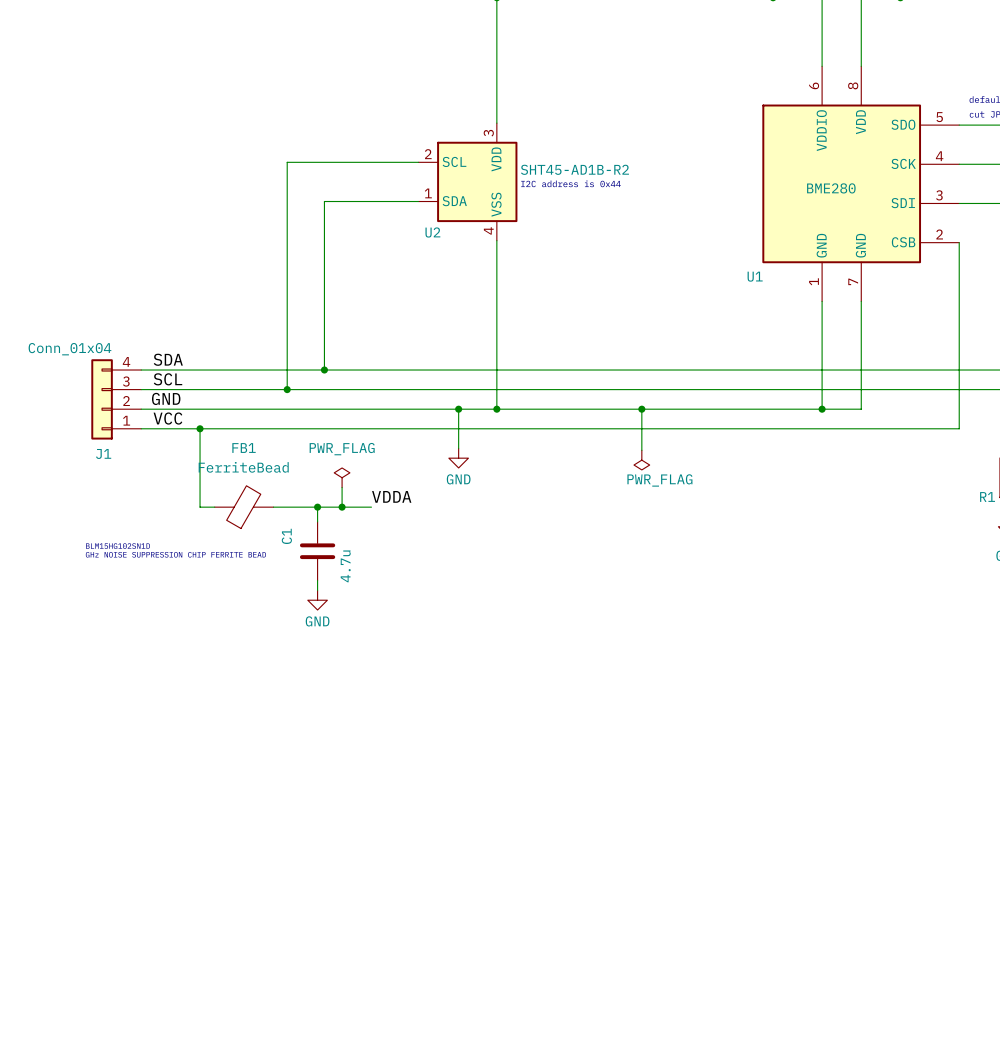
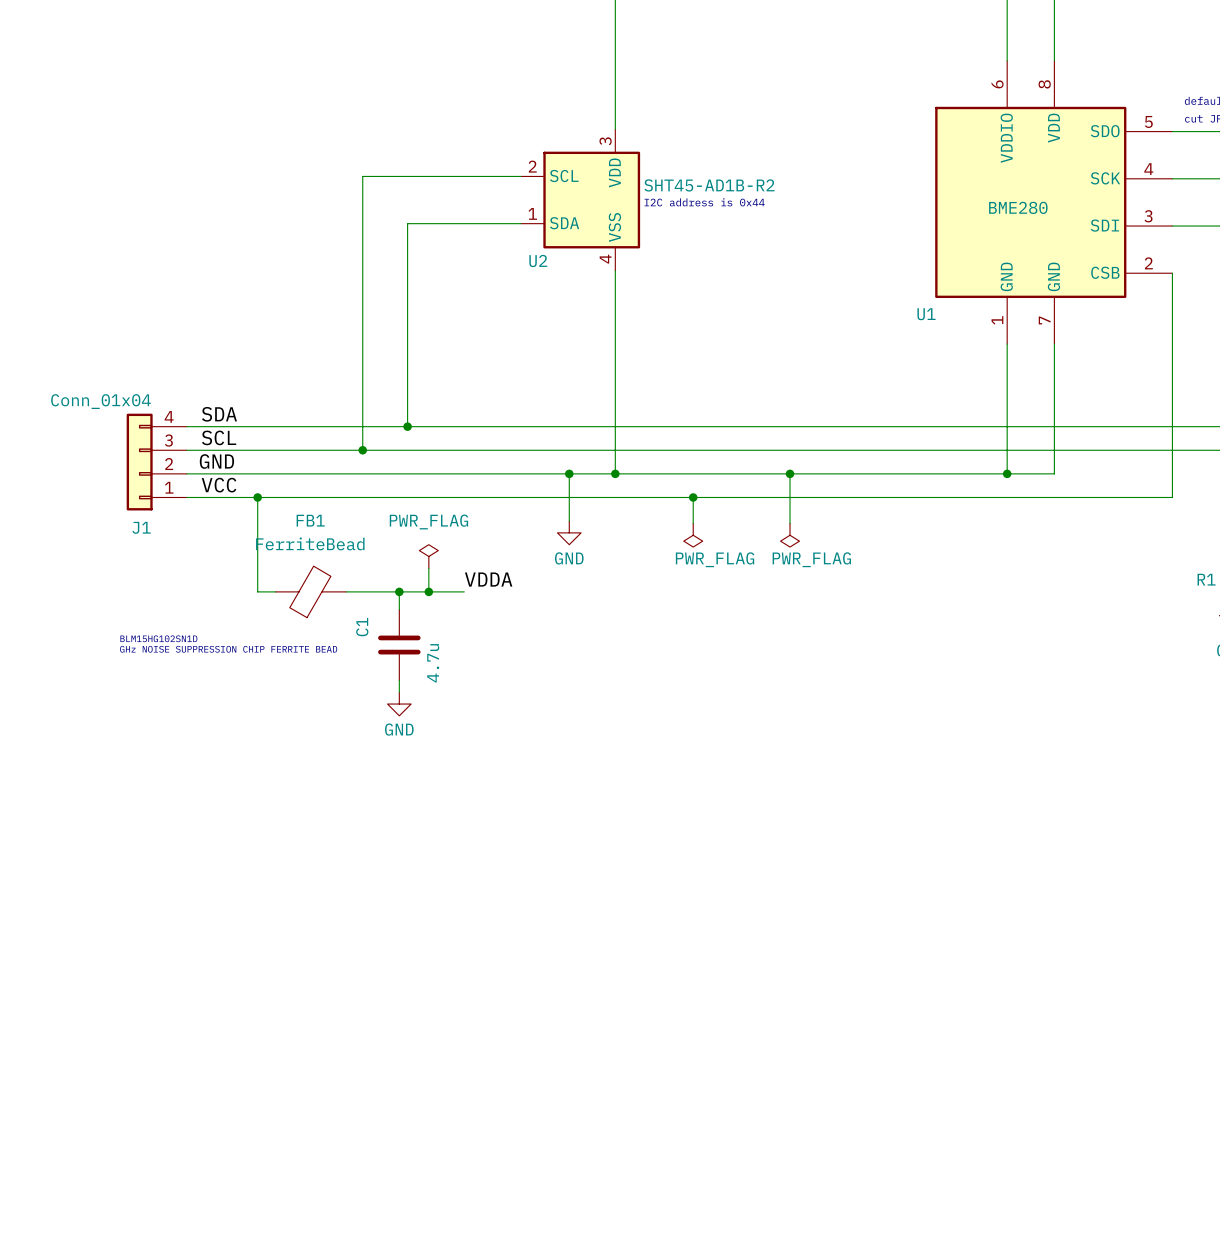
wire: none -> (693, 497) (693, 523)
junction: none -> (693, 497)
power symbol: none -> PWR_FLAG (693, 535)

